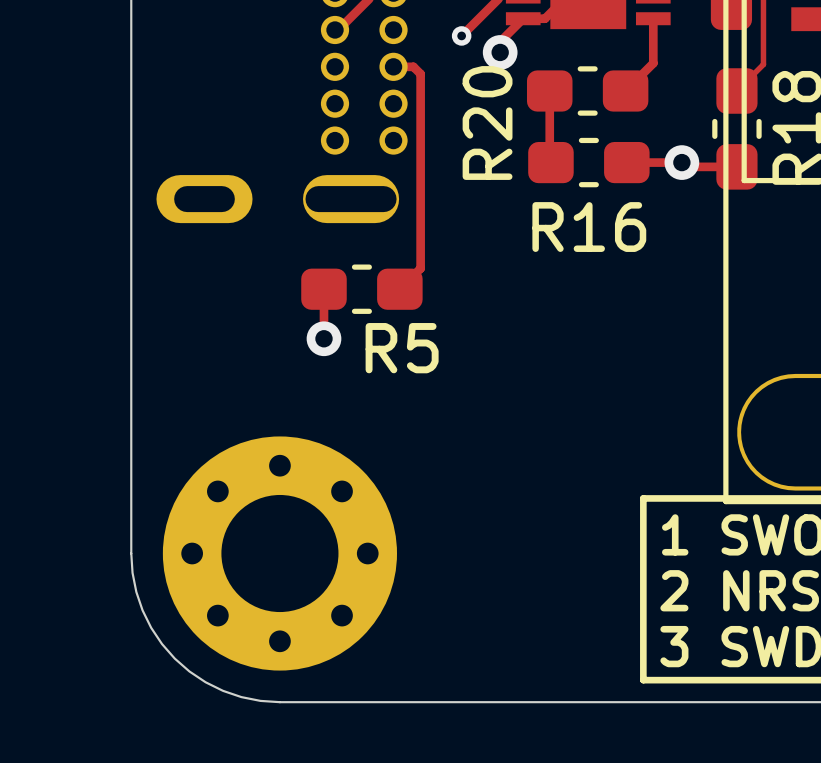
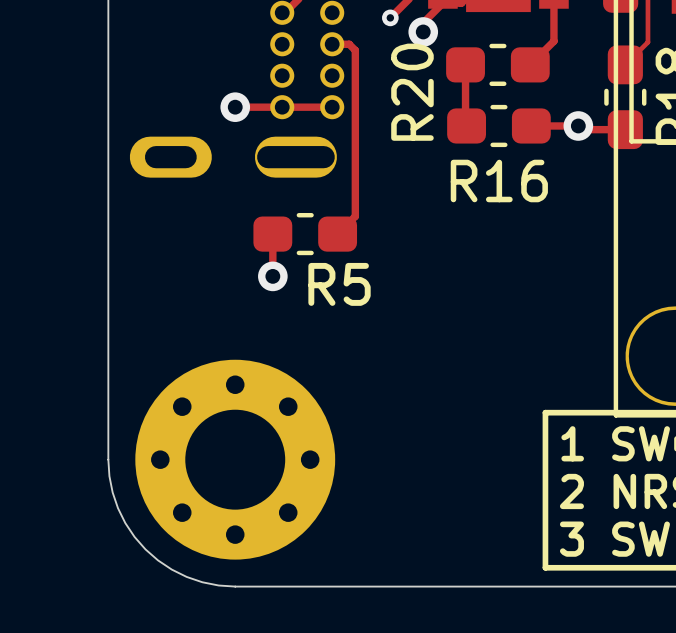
track: none -> (235, 107) (332, 107)
via: none -> (235, 107)

